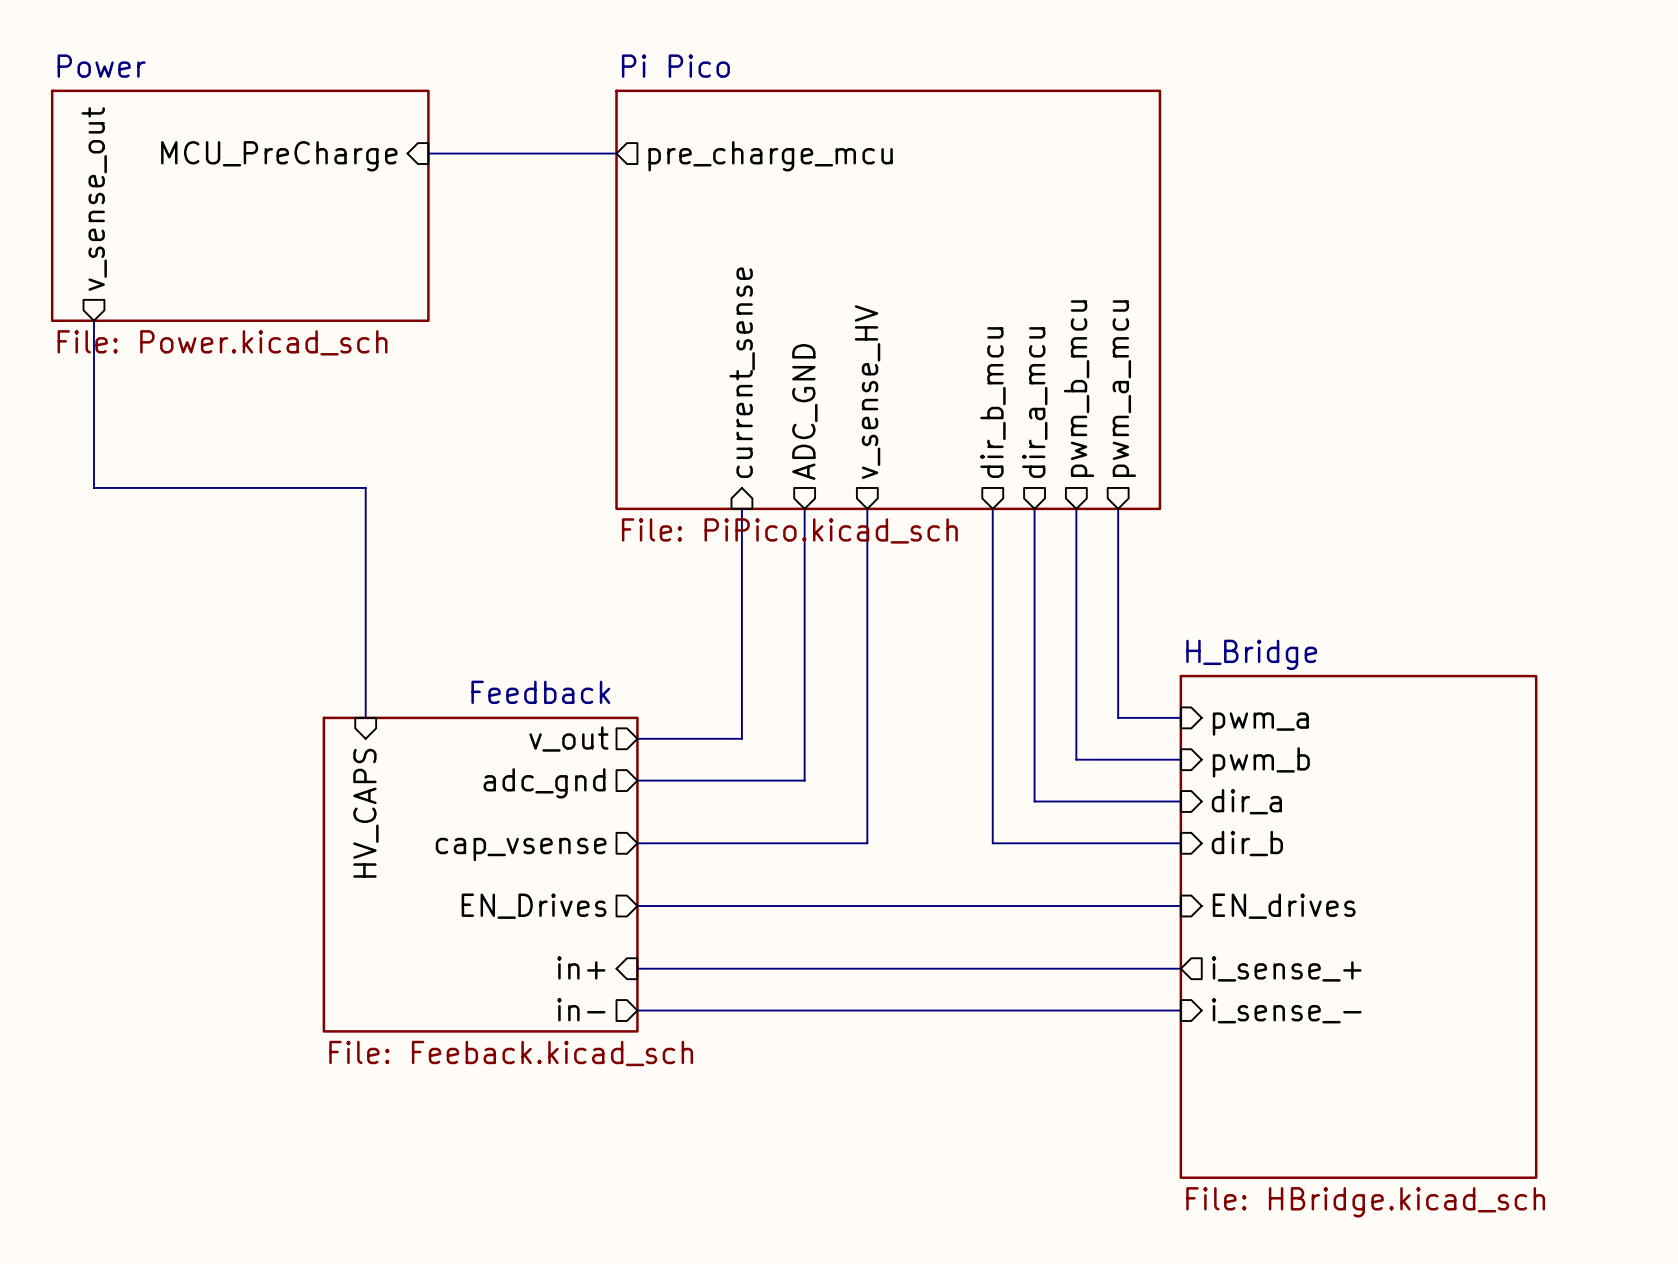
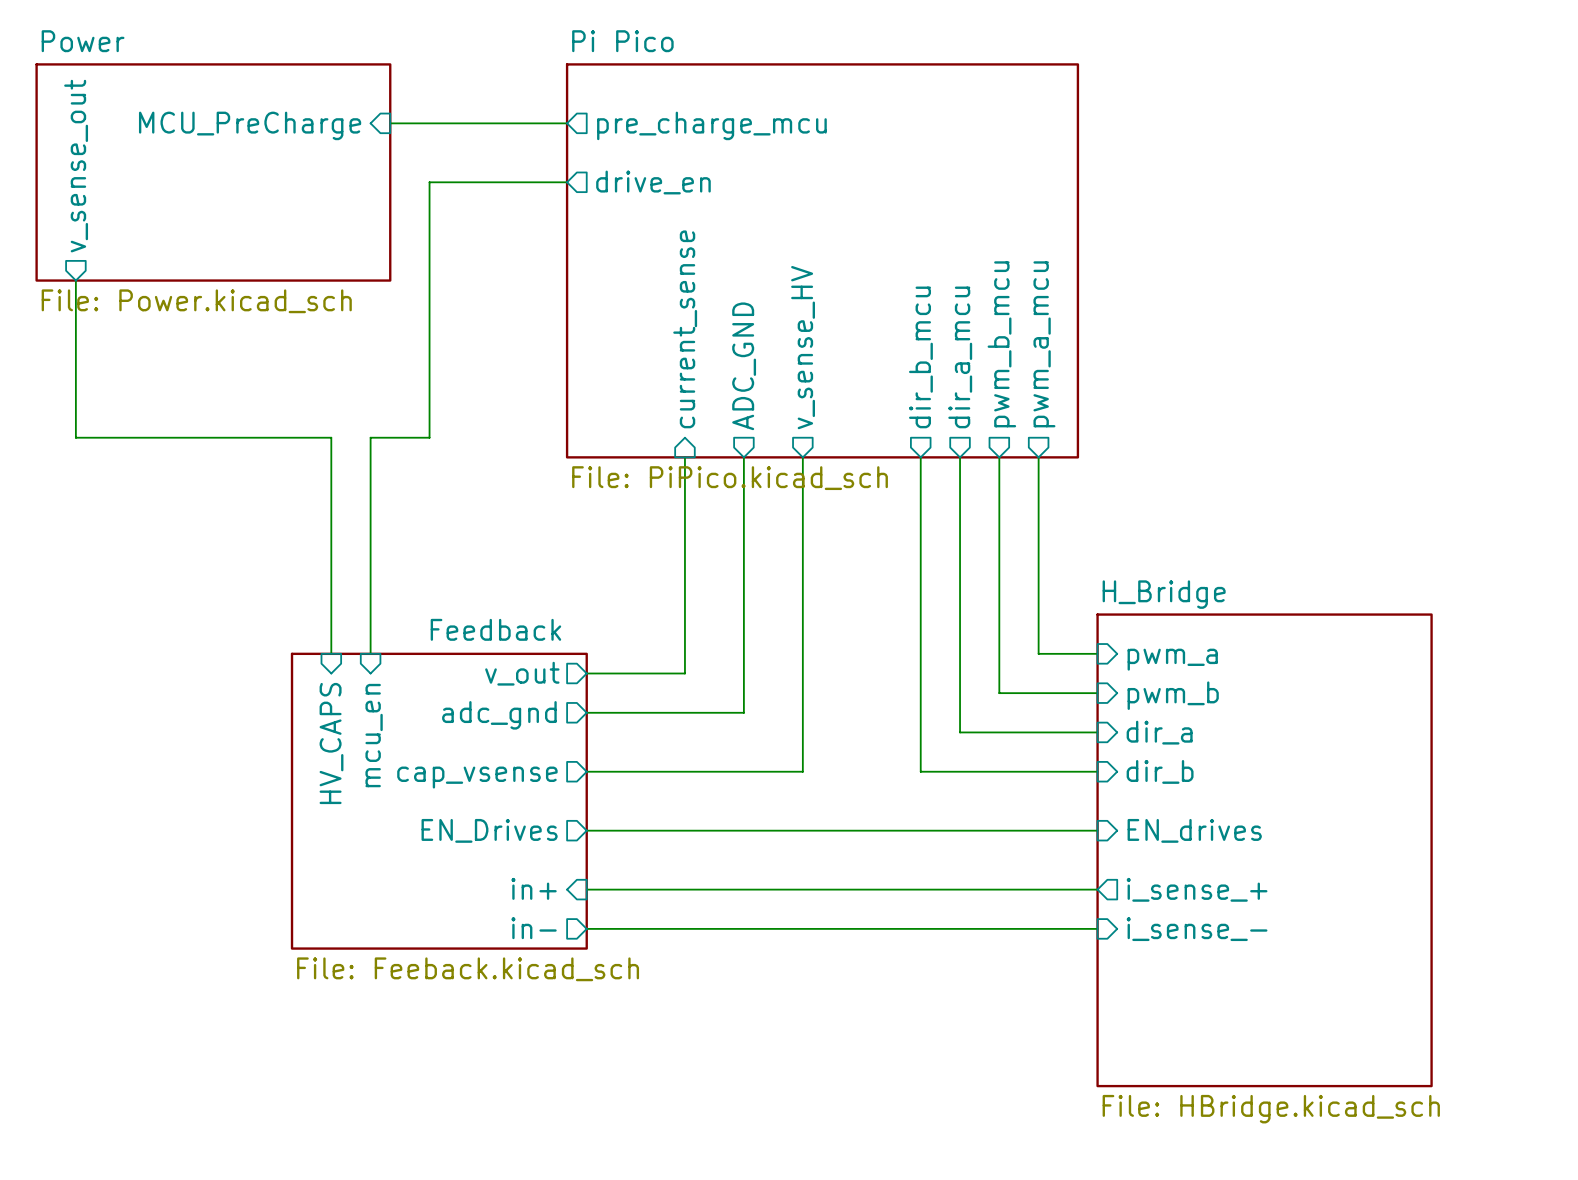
wire: none -> (567, 182) (429, 182) (429, 437) (370, 437) (370, 653)
sheet pin: none -> drive_en (653, 182)
sheet pin: none -> mcu_en (374, 735)

